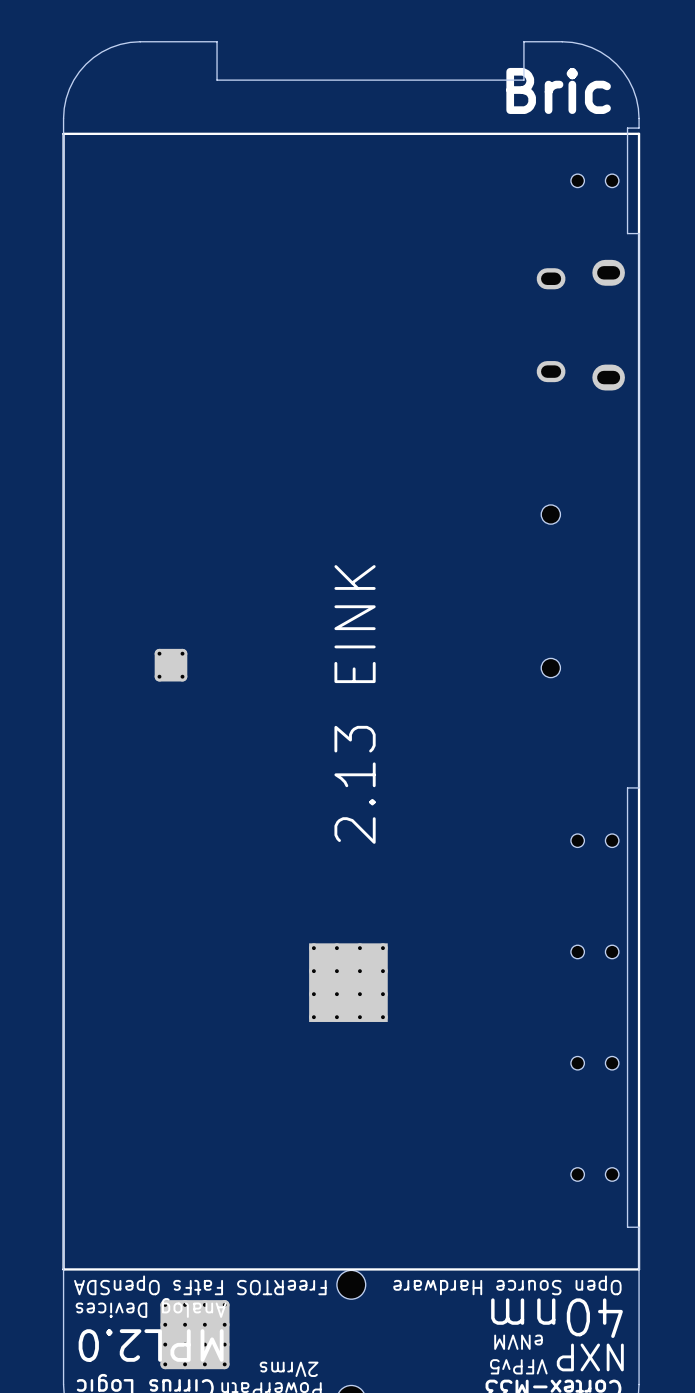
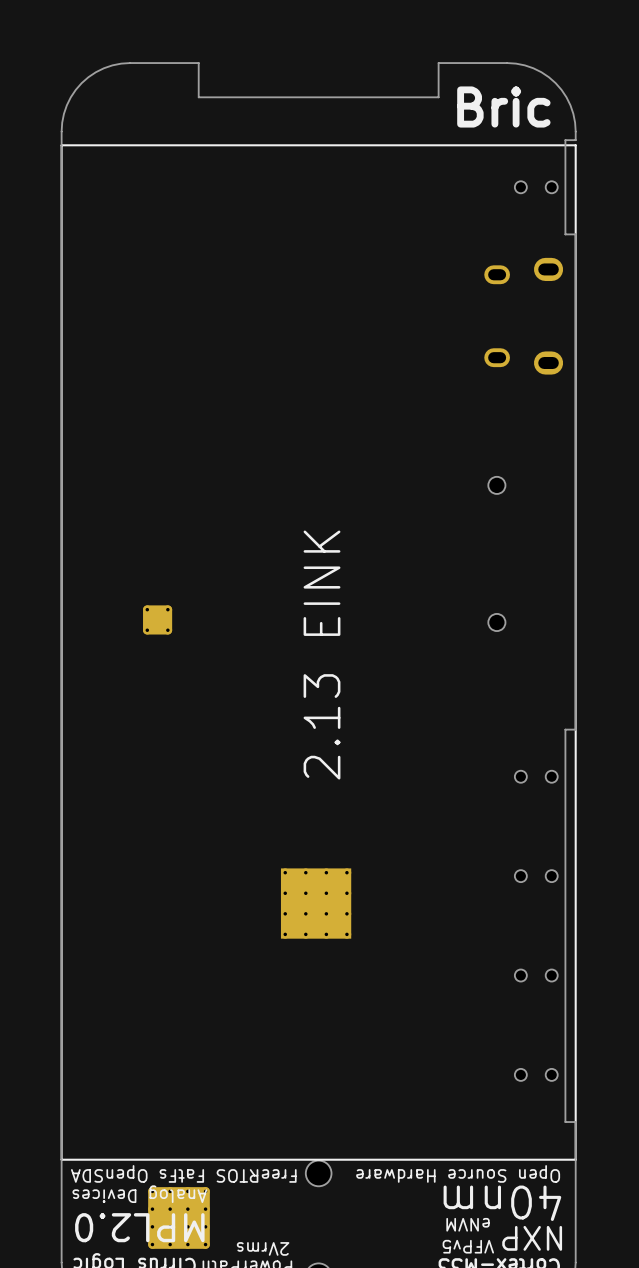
board edge: (523, 41) (523, 80) (485, 80) -> (472, 63) (438, 63) (438, 97)

